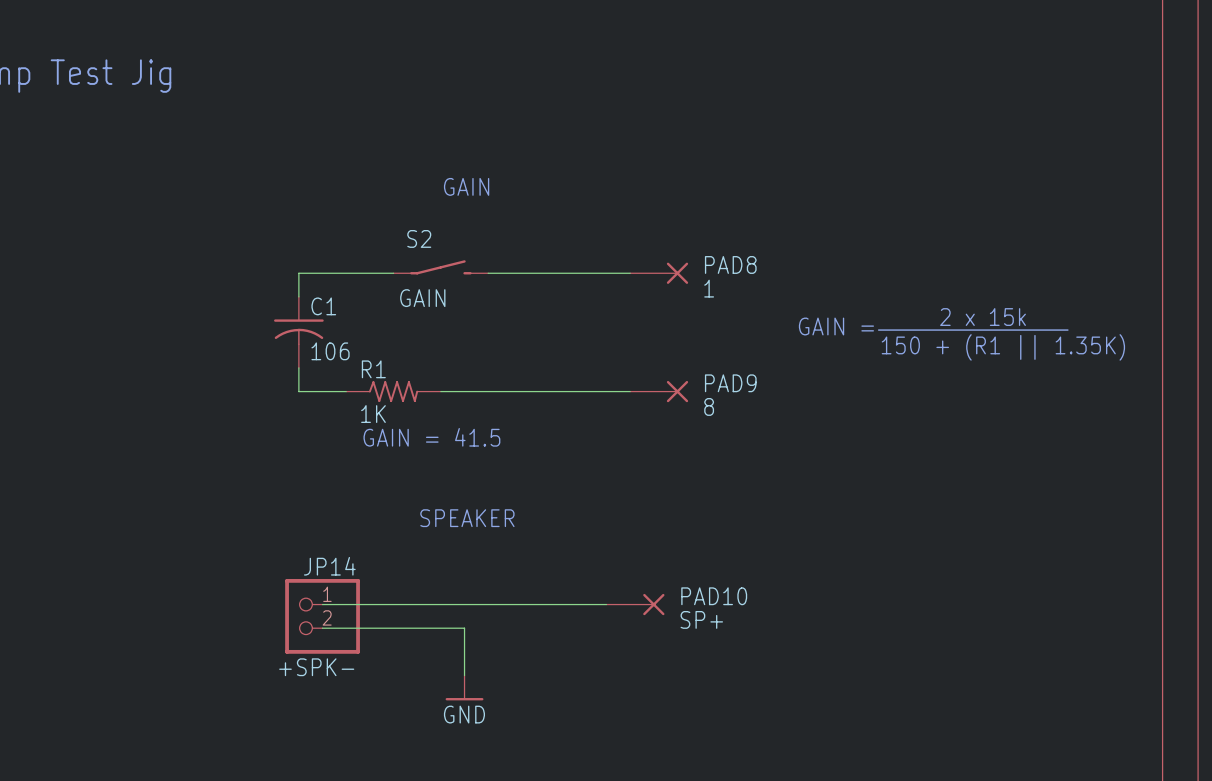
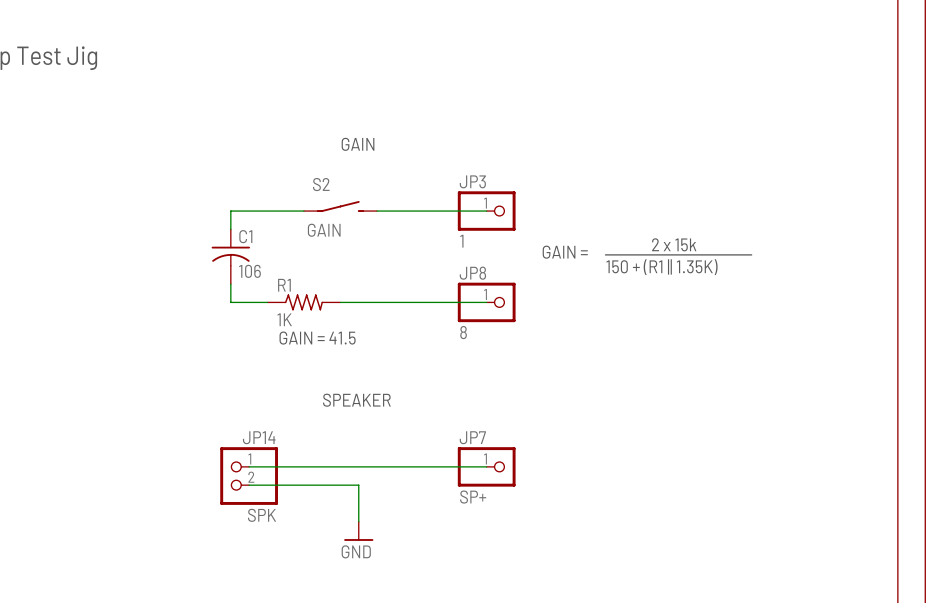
JP3: none -> 1 (486, 211)
PAD8: 1 (659, 273) -> none
text position: 2 x 15k (983, 317) -> 2 x 15k (674, 244)
text position: GAIN = (836, 326) -> GAIN = (565, 252)
line: (973, 330) (1067, 330) -> (605, 254) (678, 254)
text position: 150 + (R1 || 1.35K) (1003, 347) -> 150 + (R1 || 1.35K) (662, 267)
JP8: none -> 8 (486, 302)
PAD9: 8 (659, 391) -> none
JP7: none -> SP+ (486, 466)
PAD10: SP+ (635, 604) -> none
JP14 value: +SPK- (316, 667) -> SPK (262, 515)

